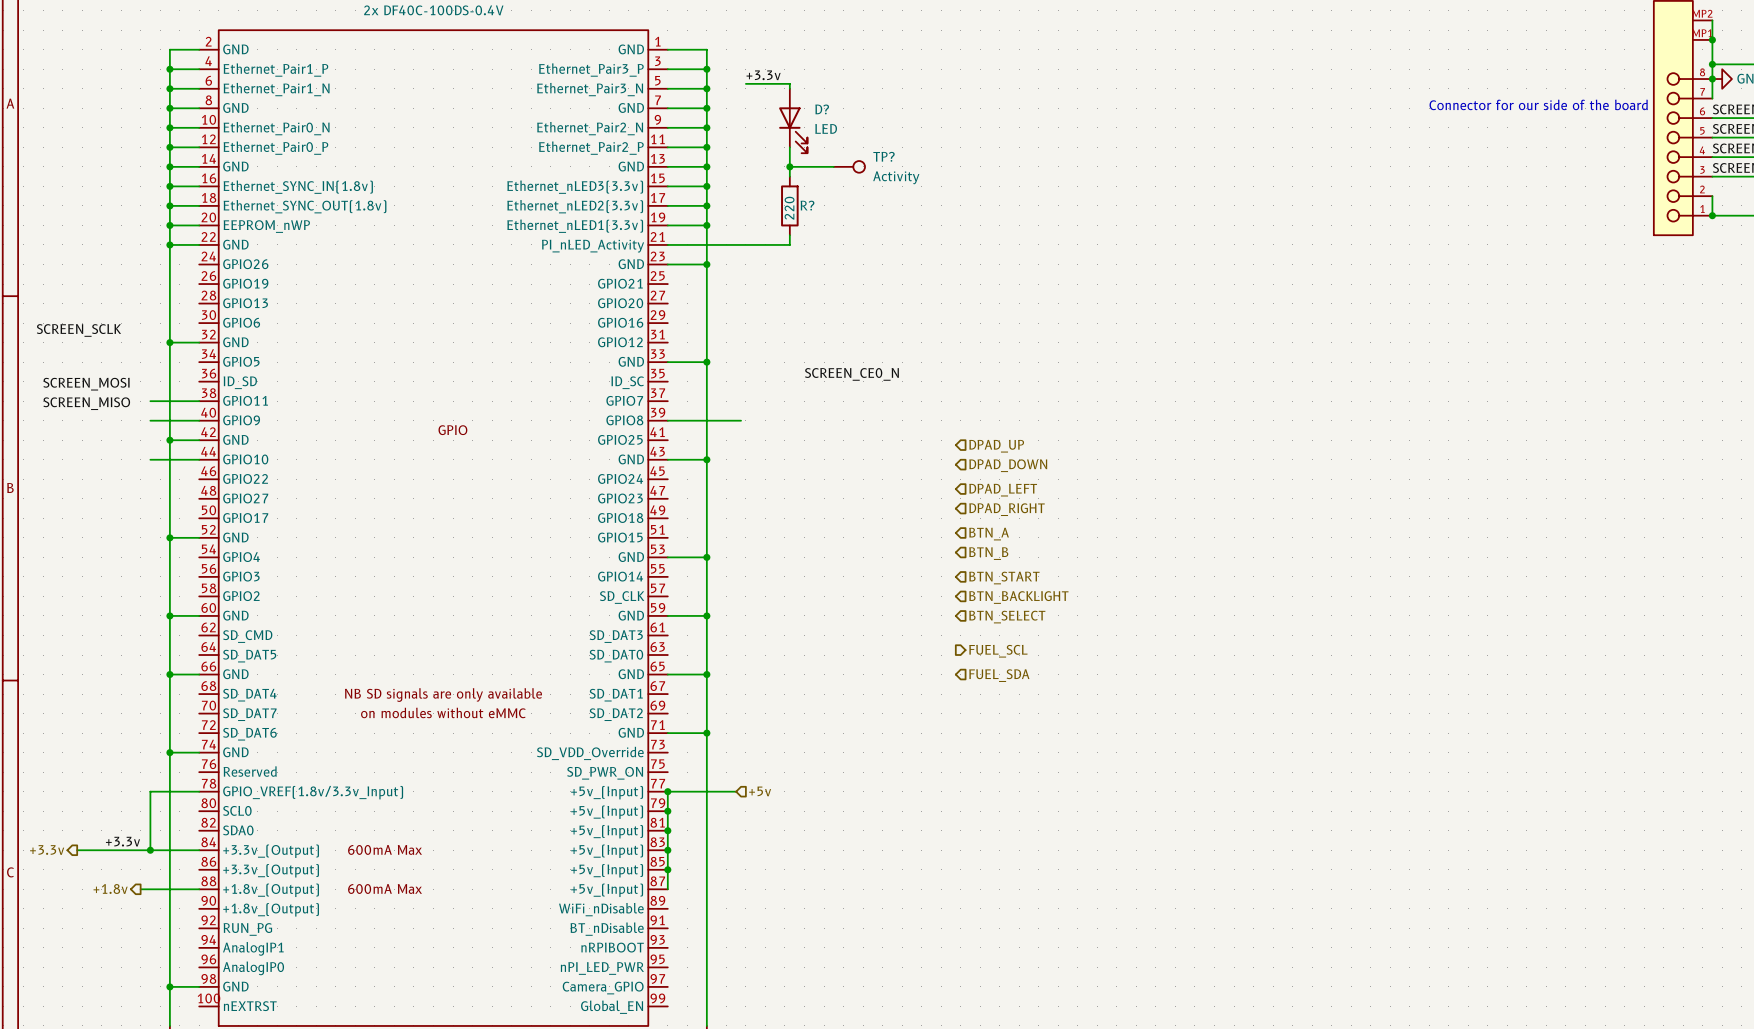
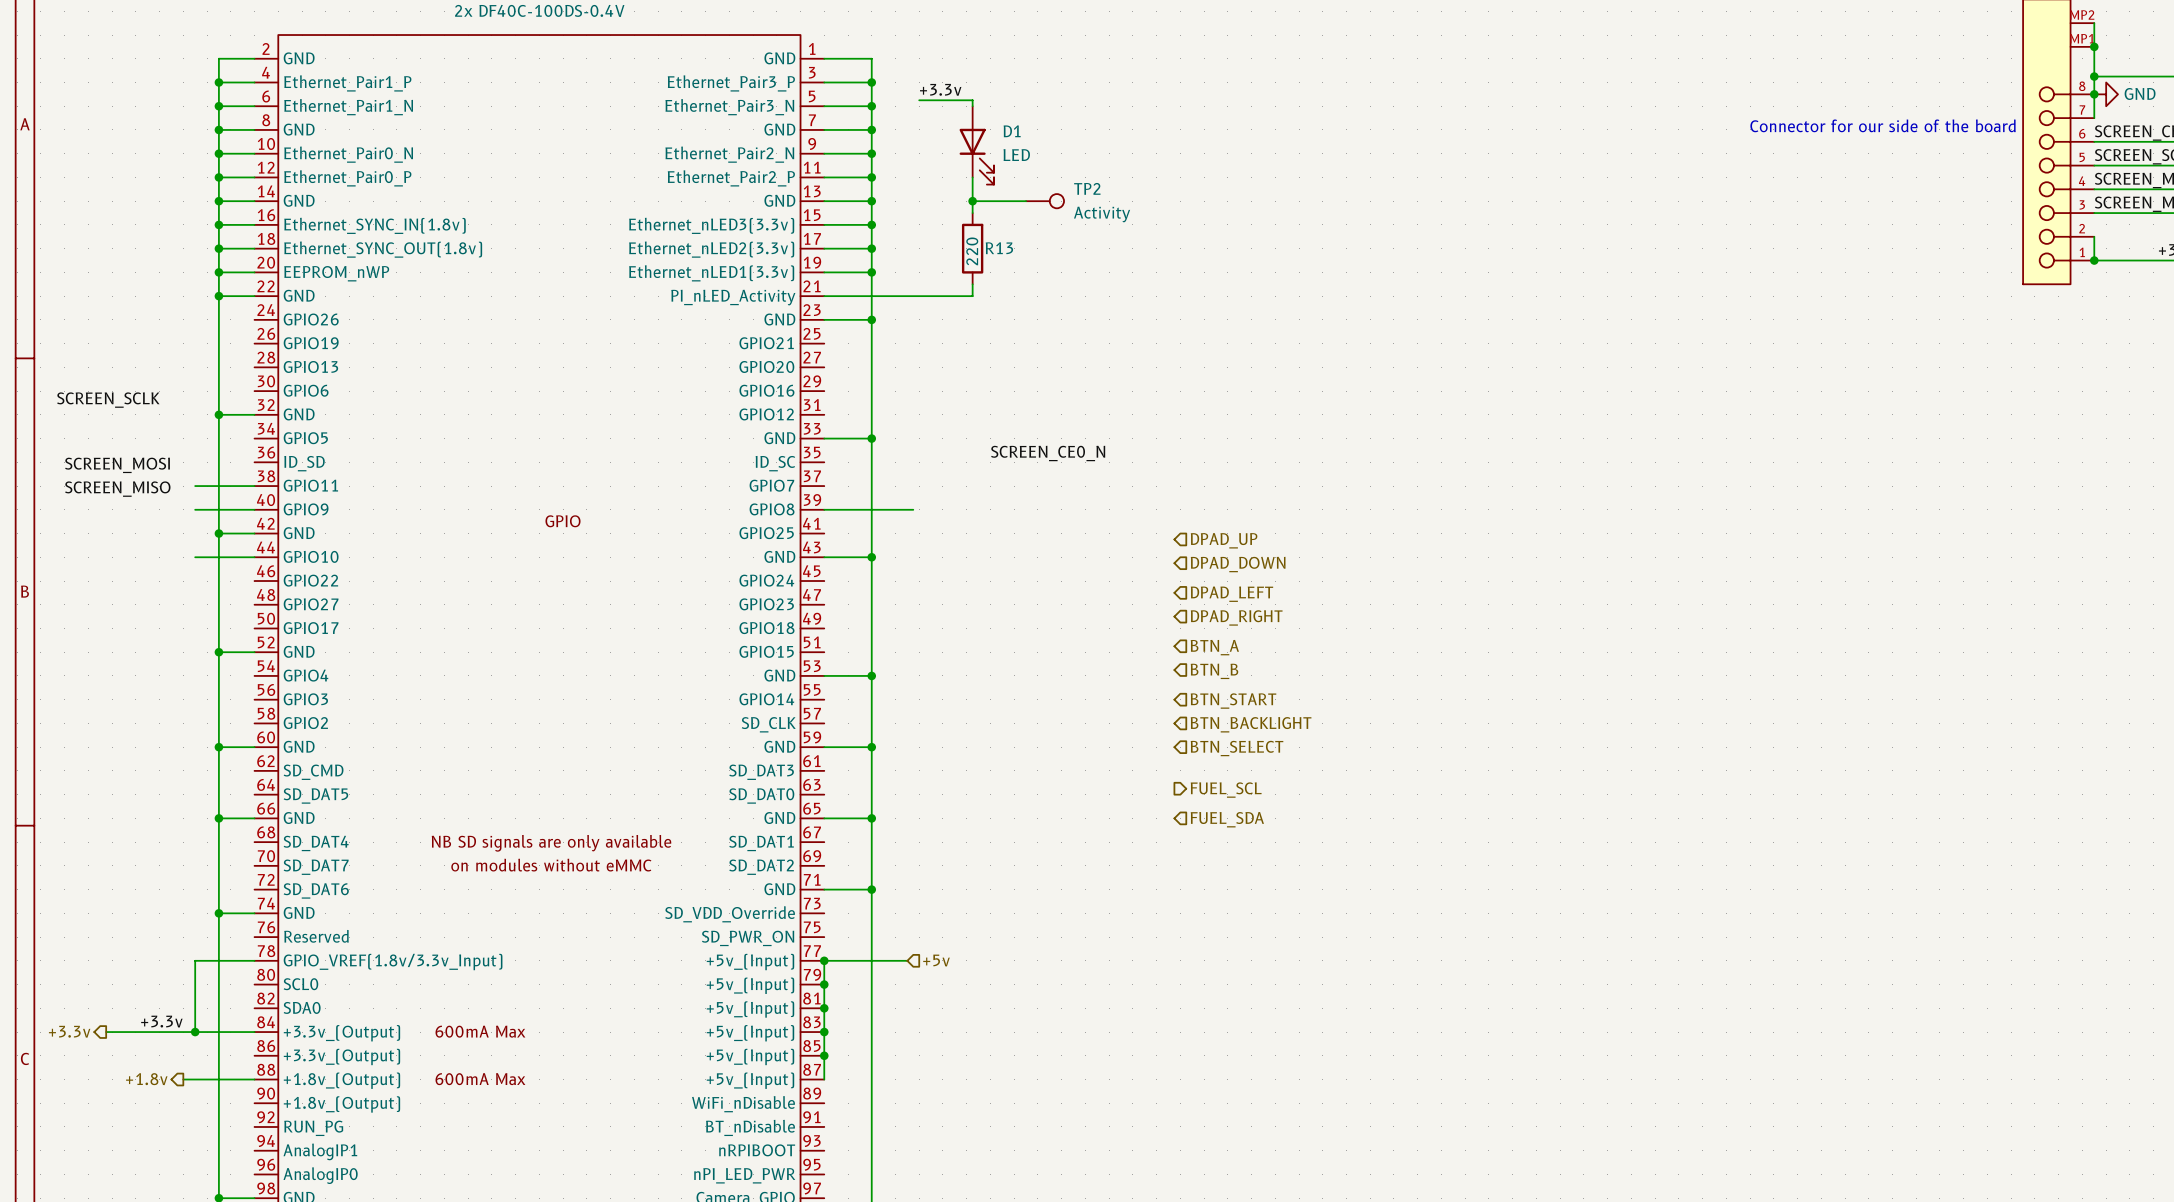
D? name: D? (822, 109) -> D1 (1012, 131)
TP? name: TP? (884, 156) -> TP2 (1087, 188)
R? name: R? (807, 205) -> R13 (999, 248)

